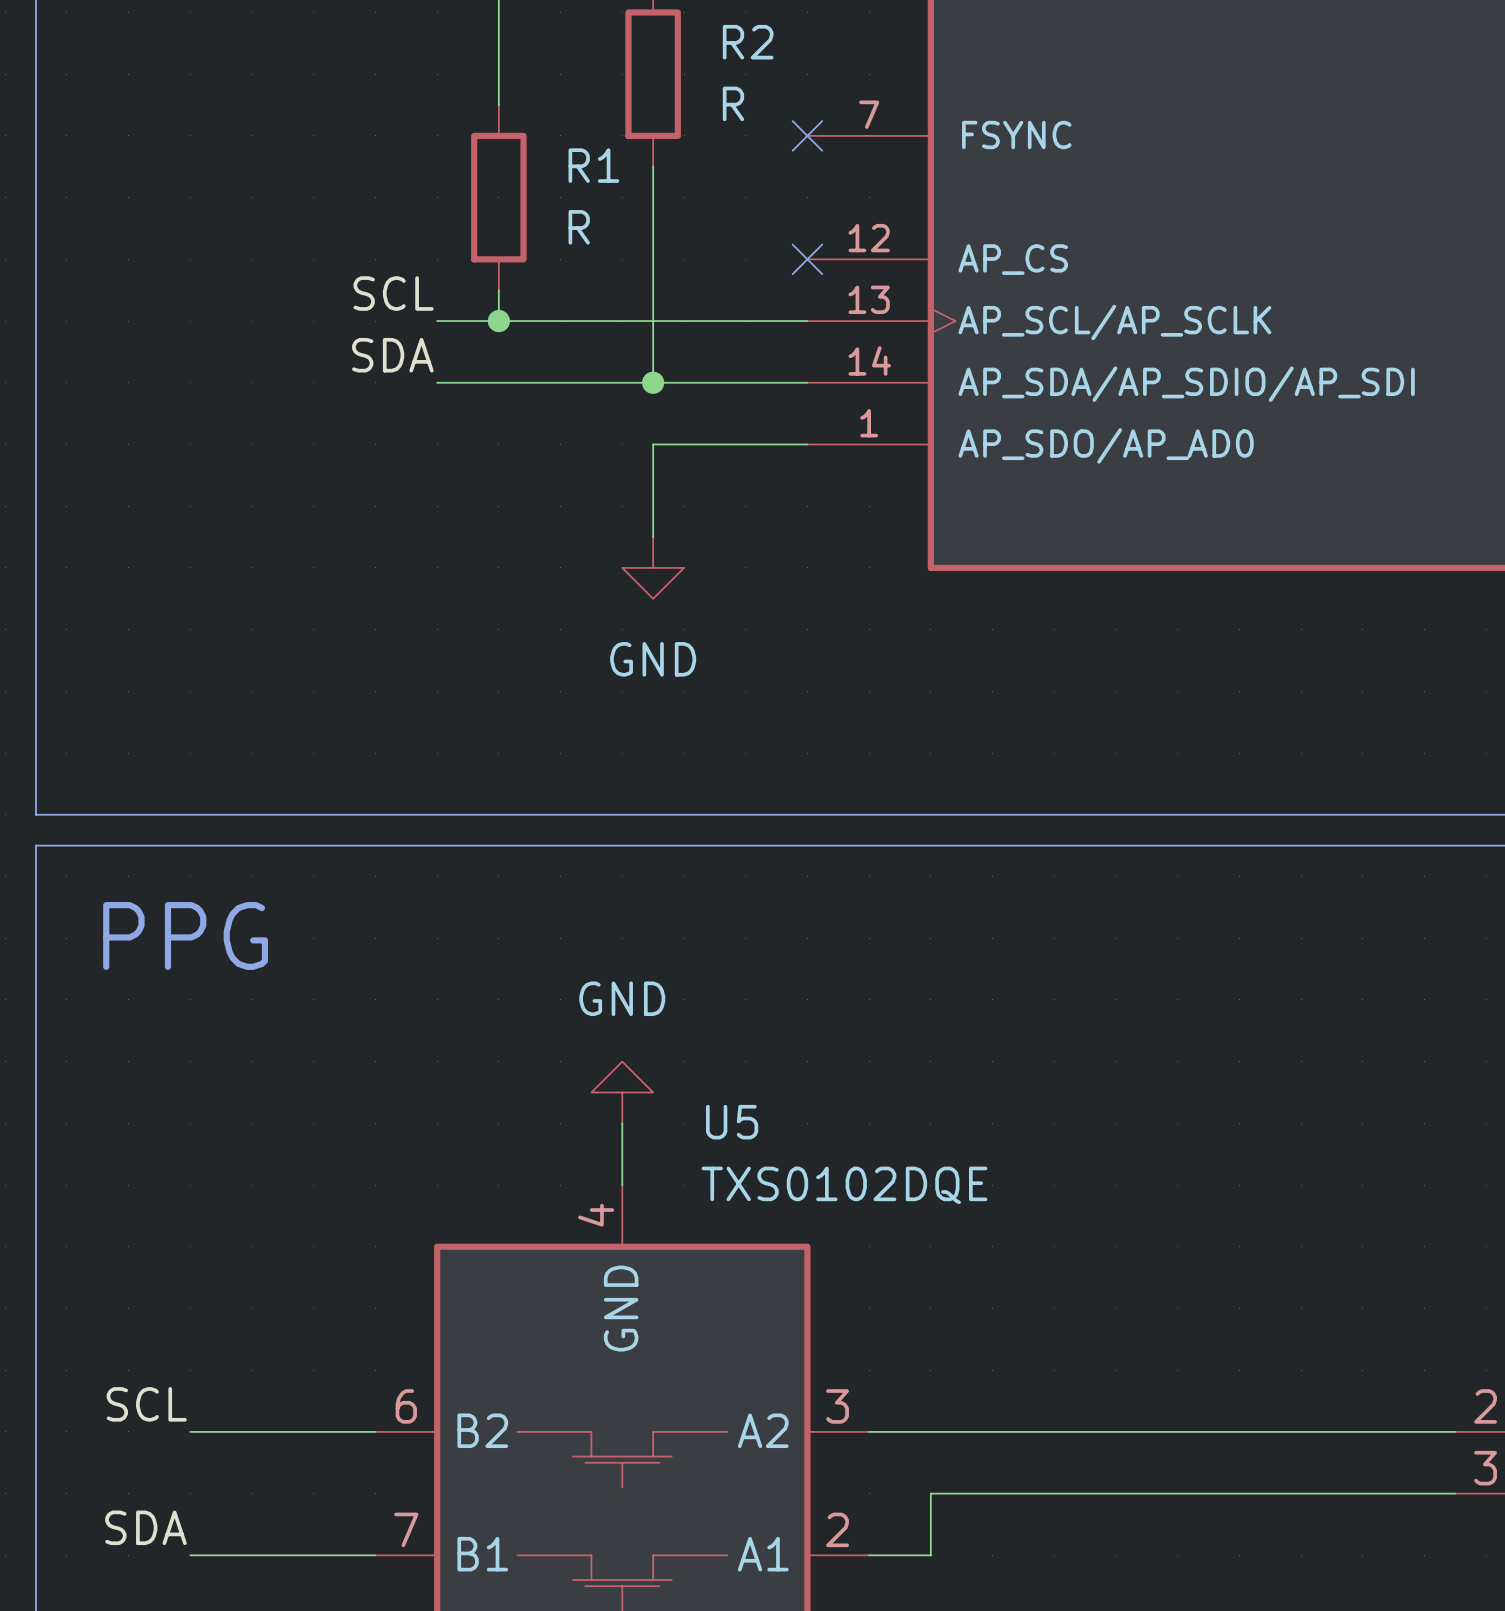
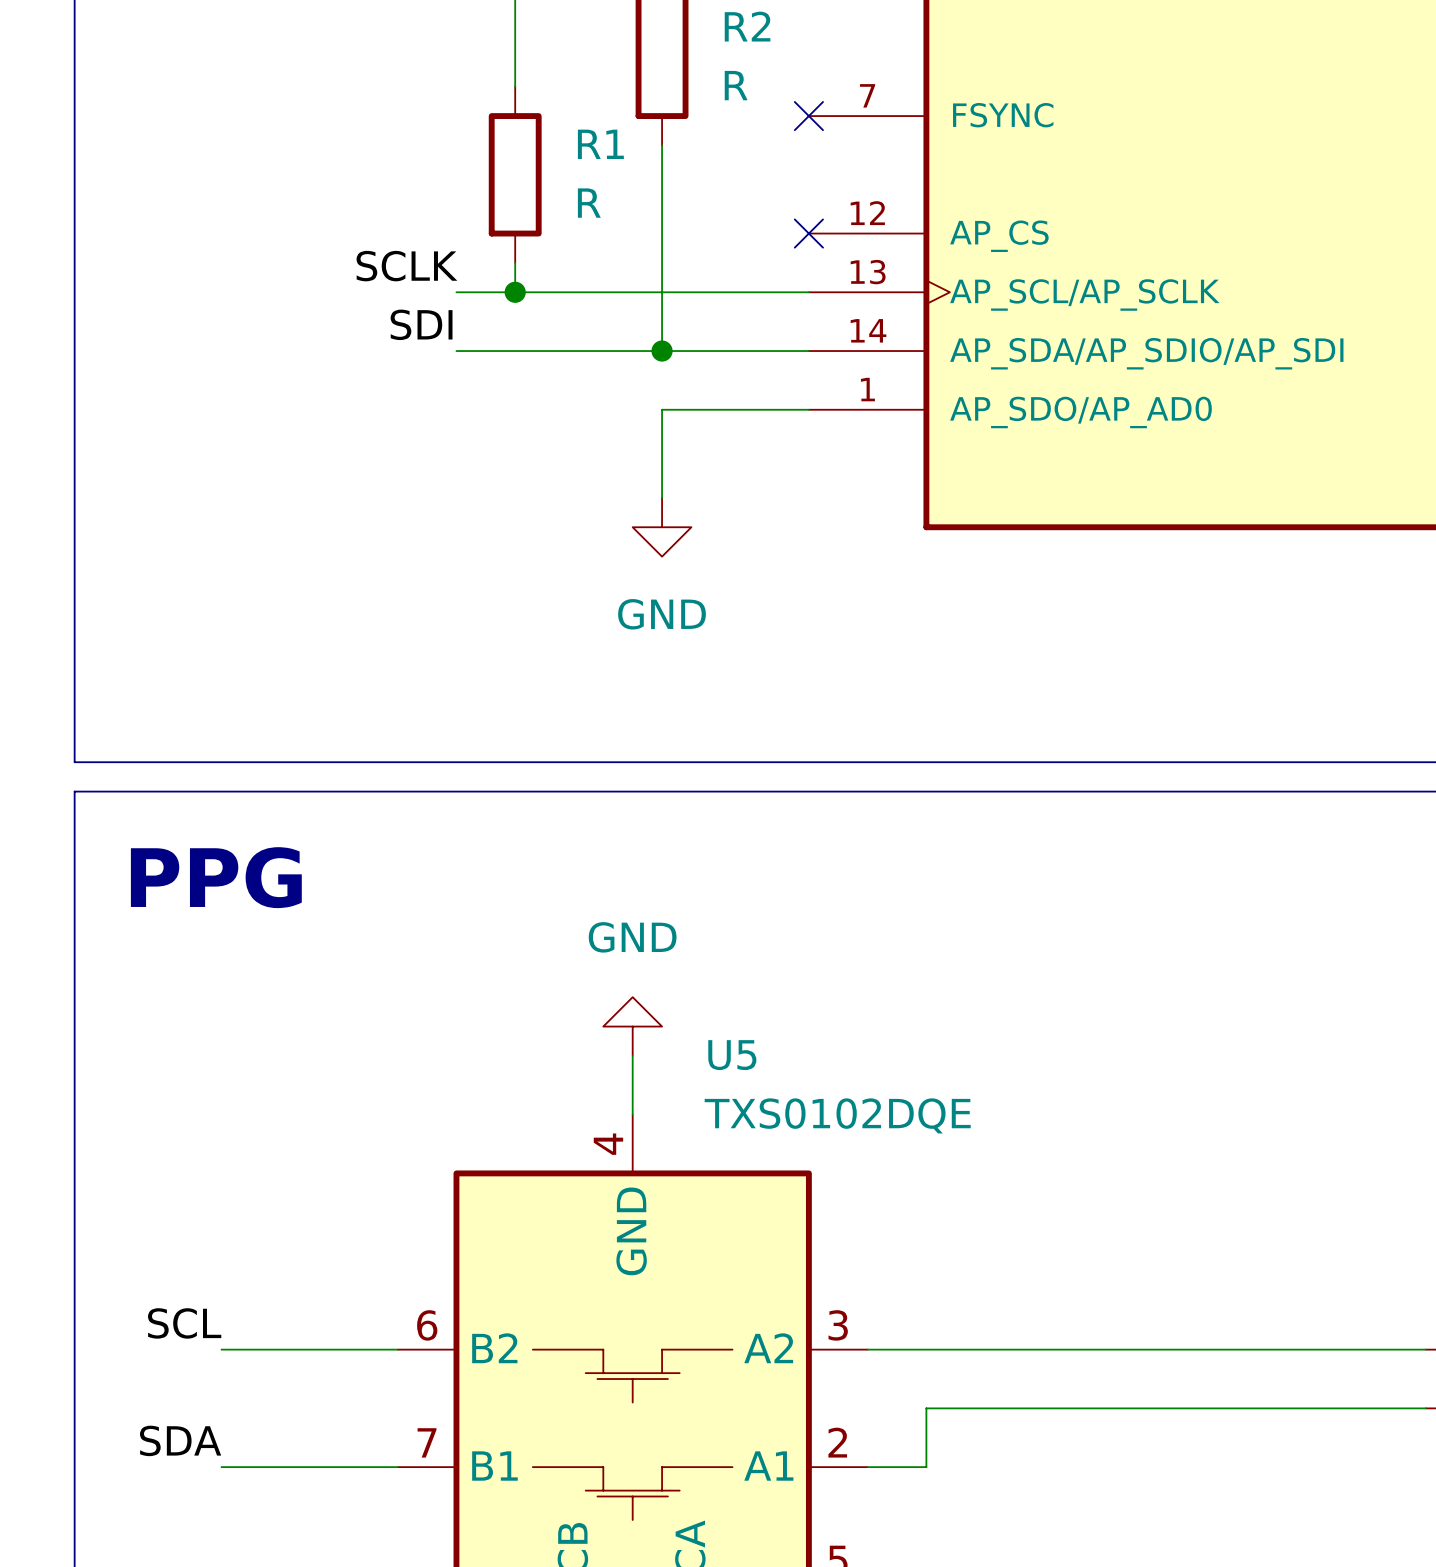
label: SCL (393, 293) -> SCLK (406, 266)
label: SDA (392, 355) -> SDI (421, 324)

